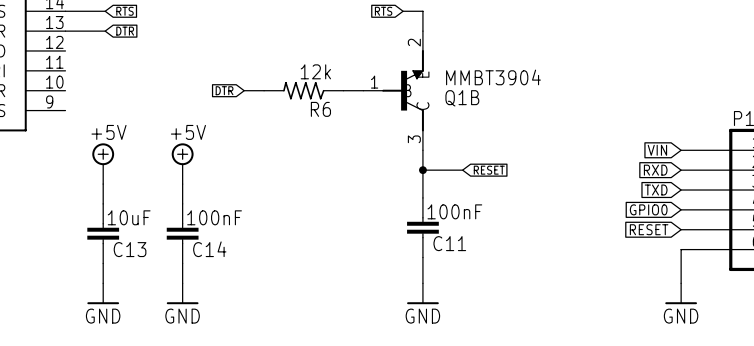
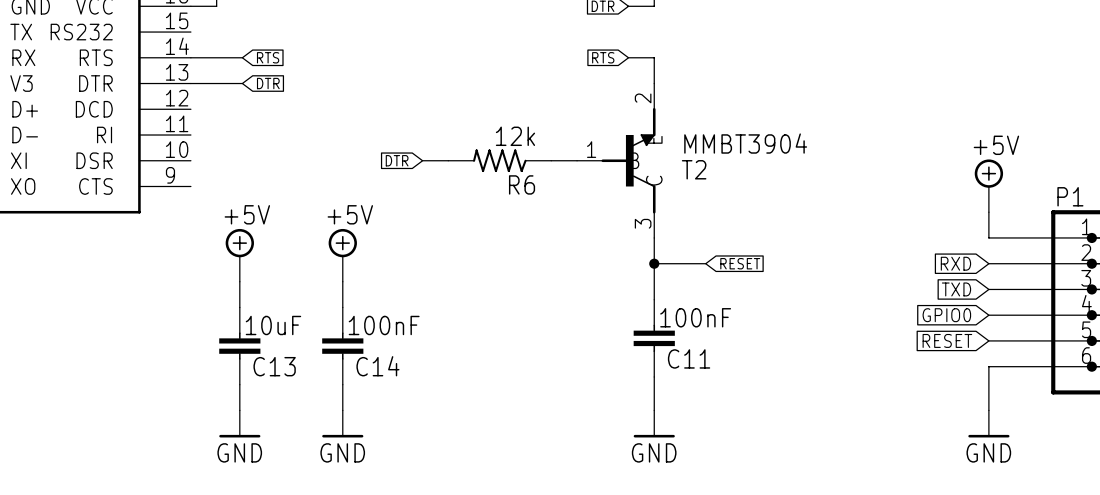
Q1B name: Q1B (462, 98) -> T2 (694, 169)
power symbol: none -> +5V (988, 185)
wire: none -> (988, 212) (988, 237)
global label: VIN (657, 150) -> none

